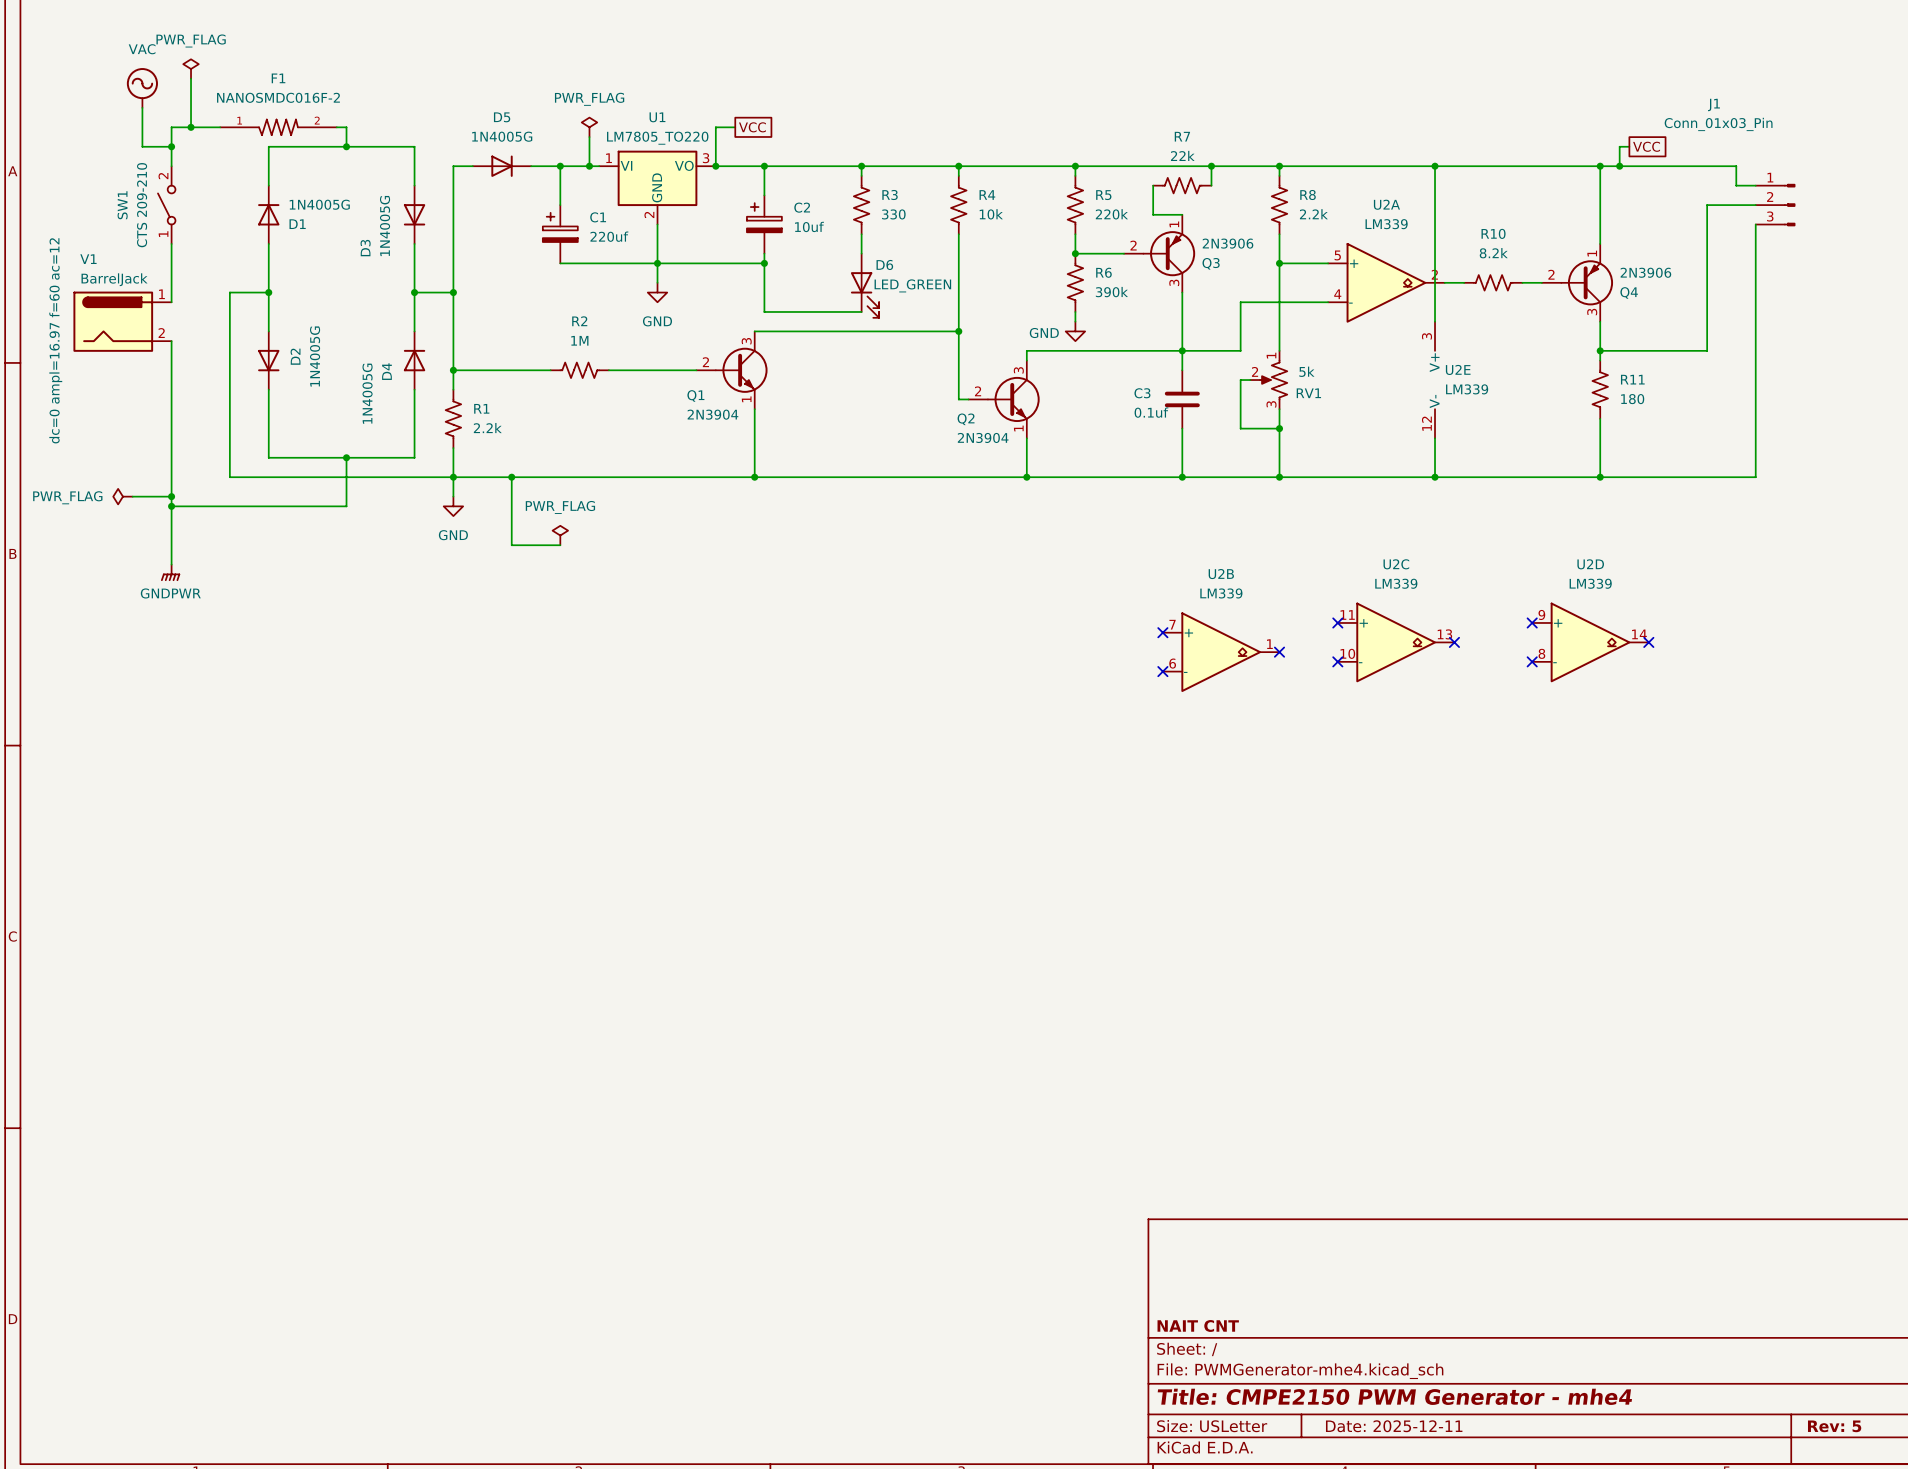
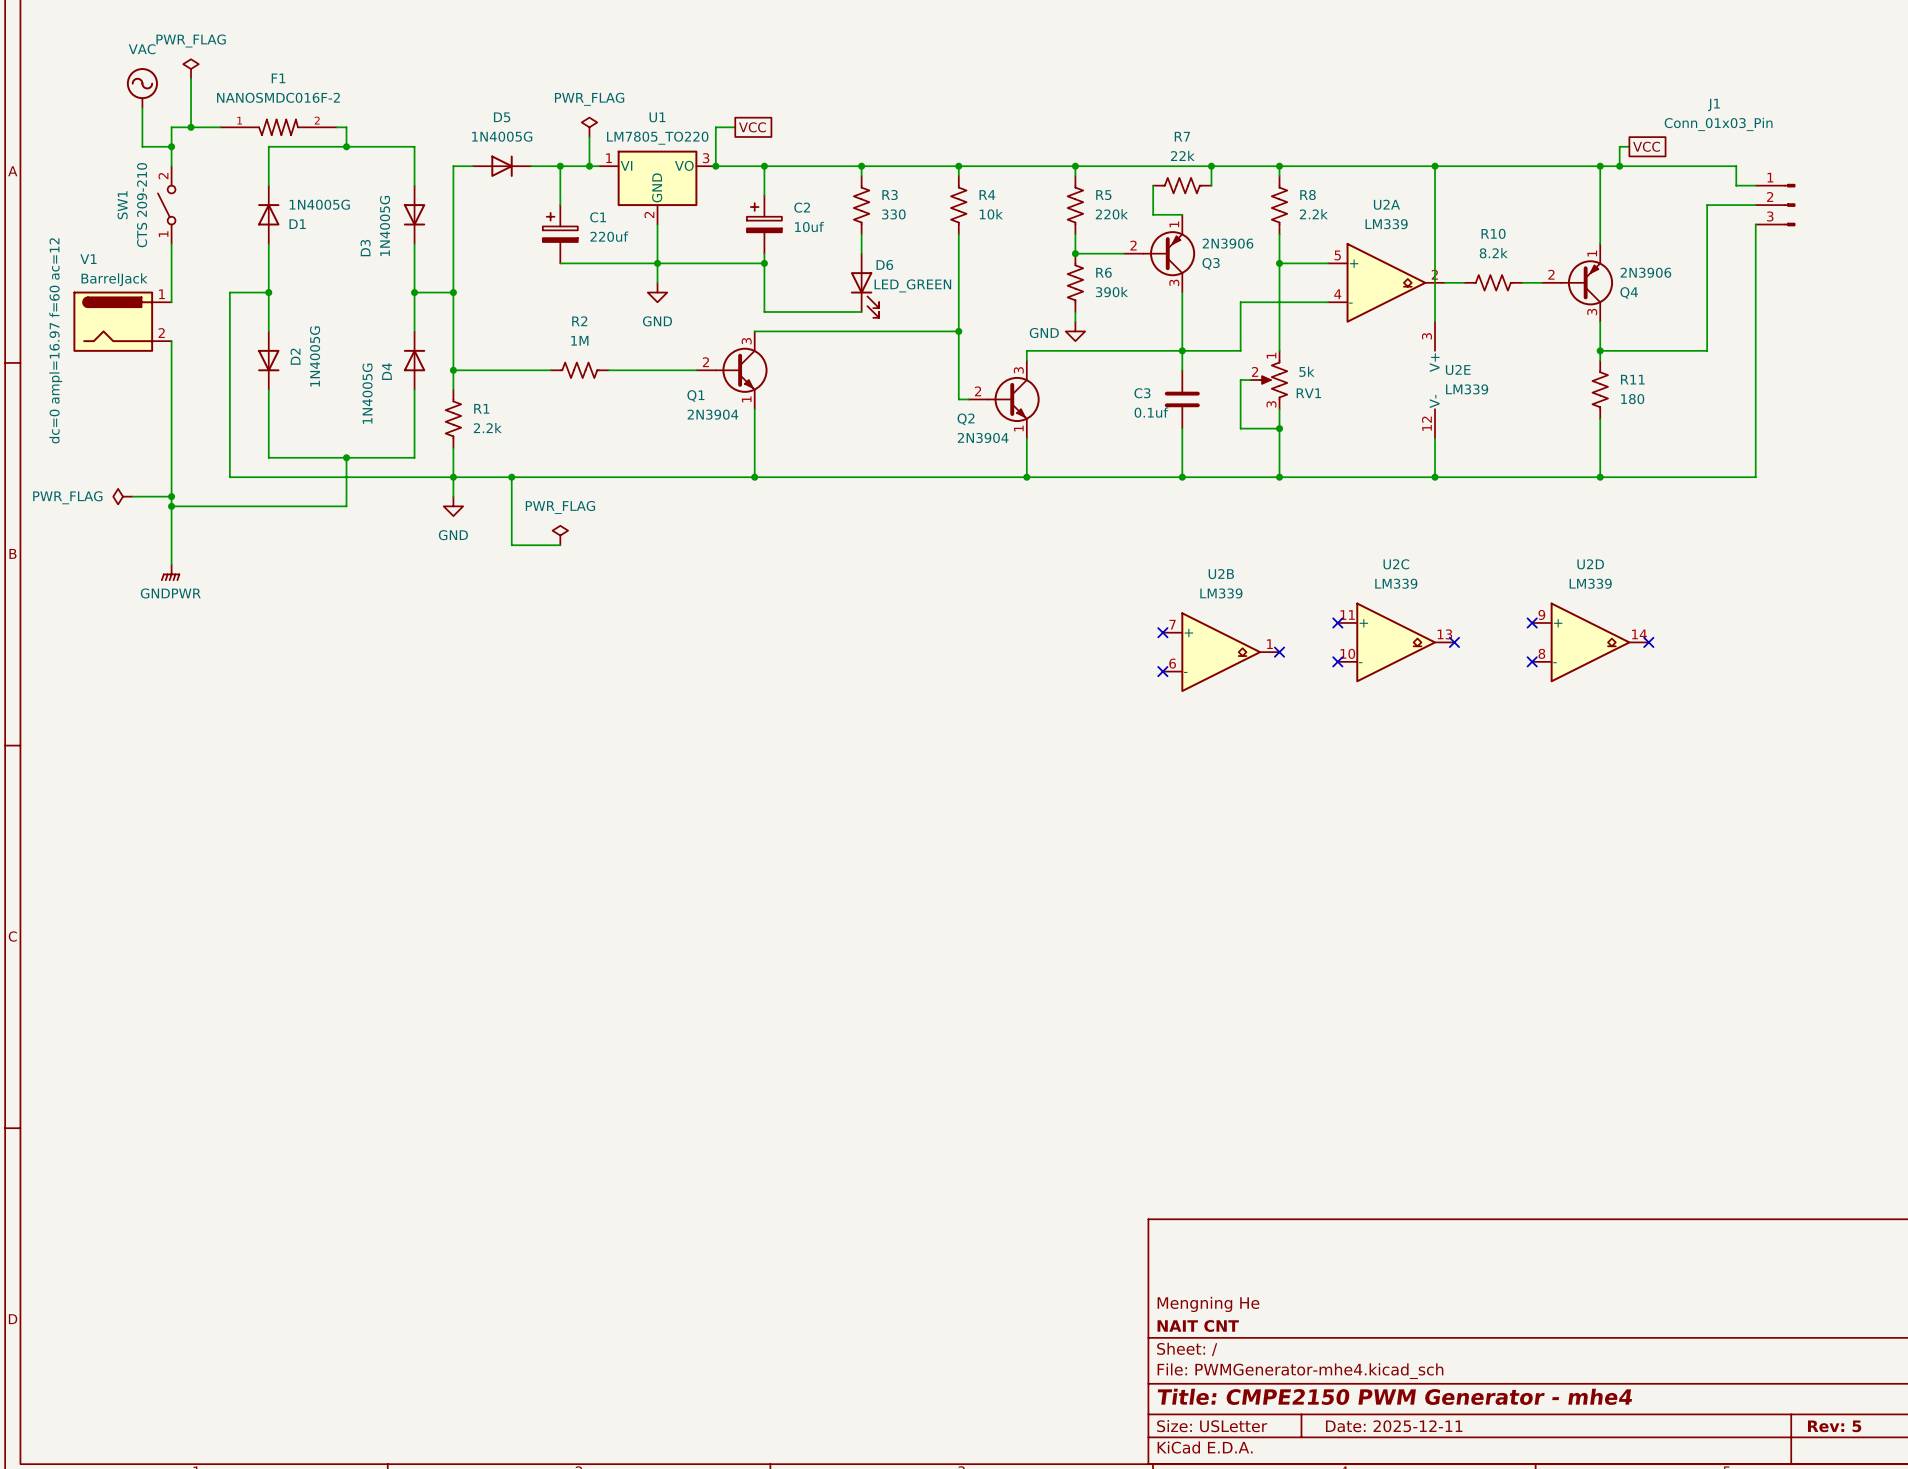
title block: none -> Mengning He (1208, 1304)

